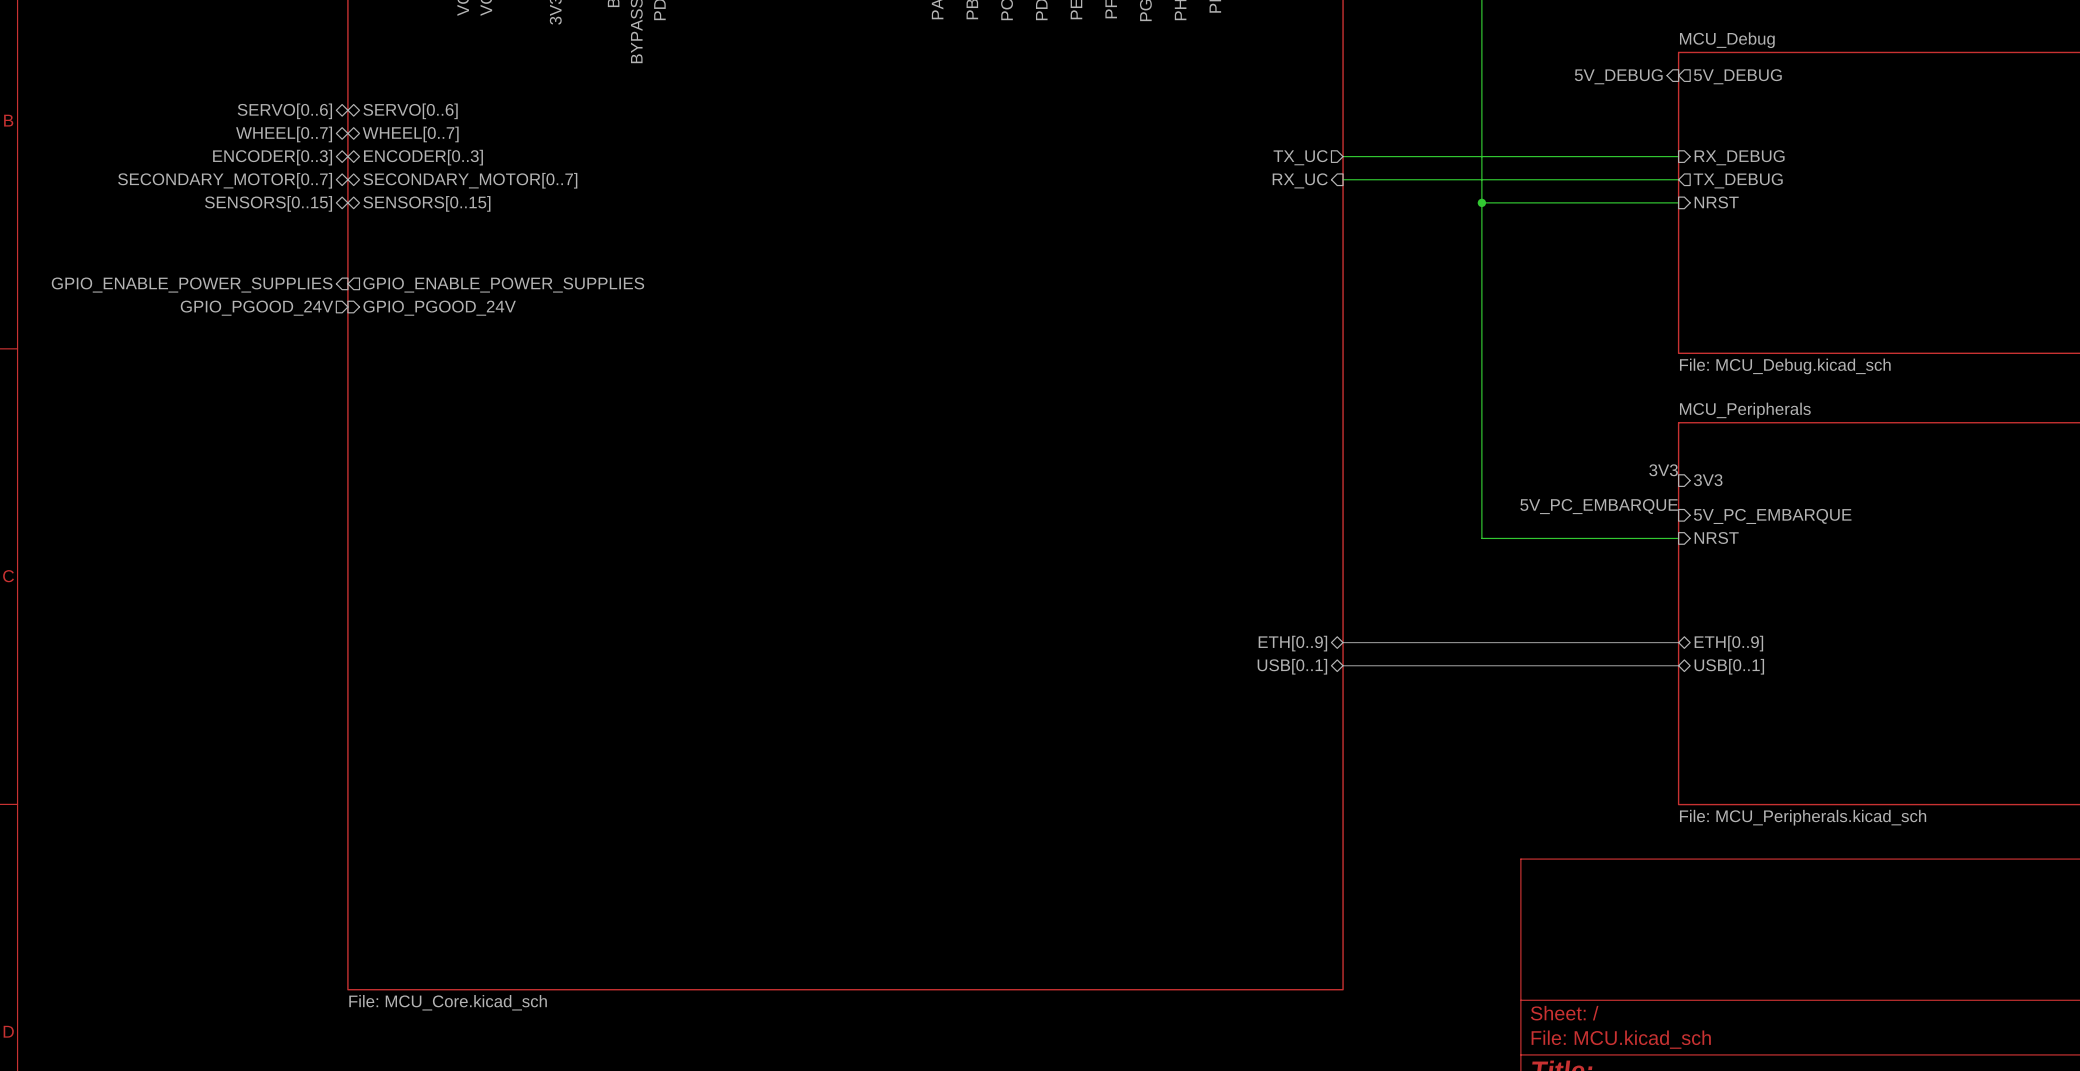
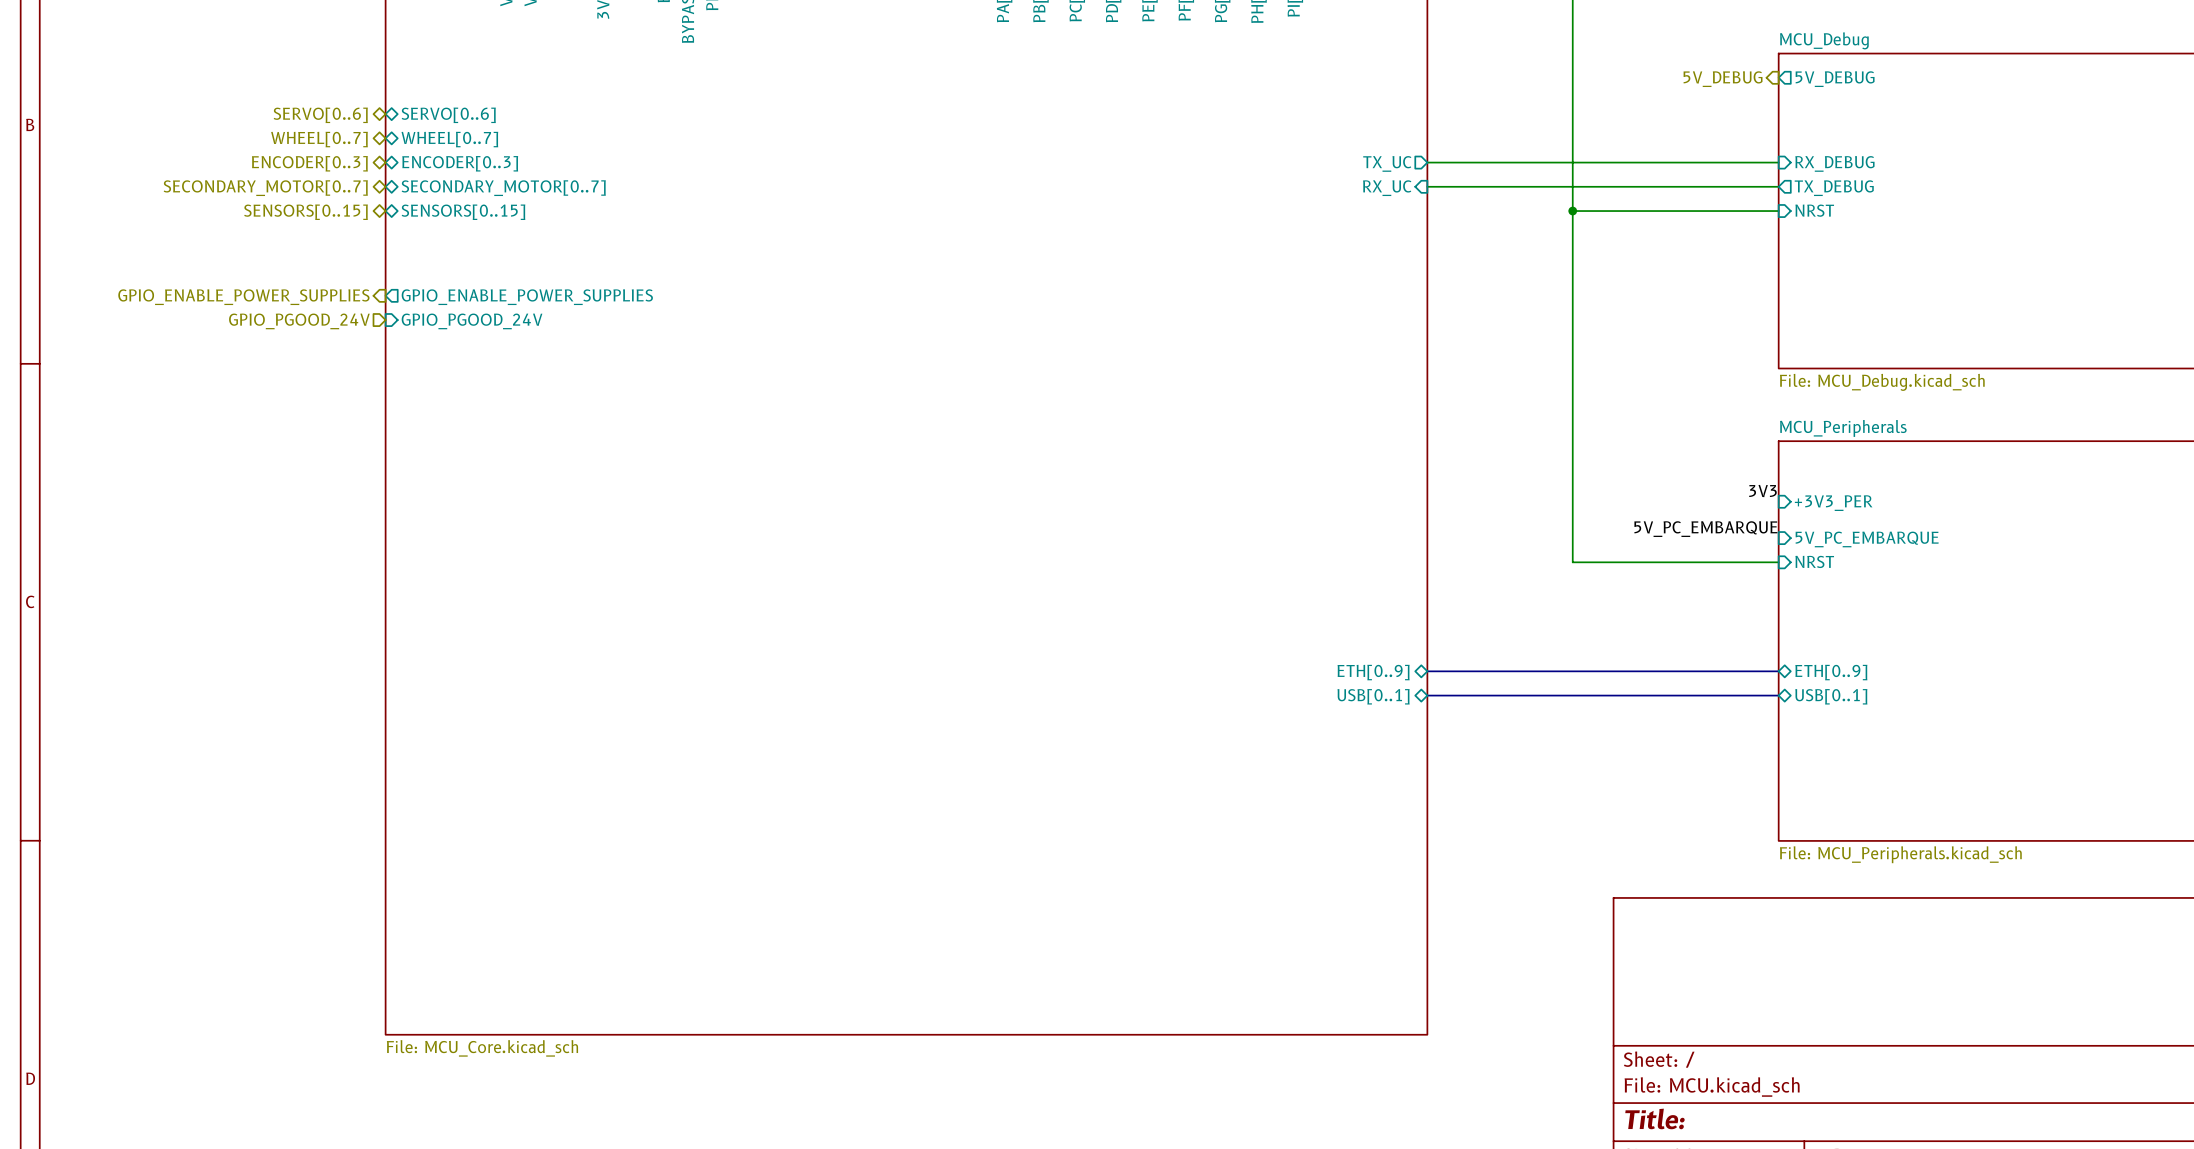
sheet pin: 3V3 (1708, 480) -> +3V3_PER (1833, 503)

